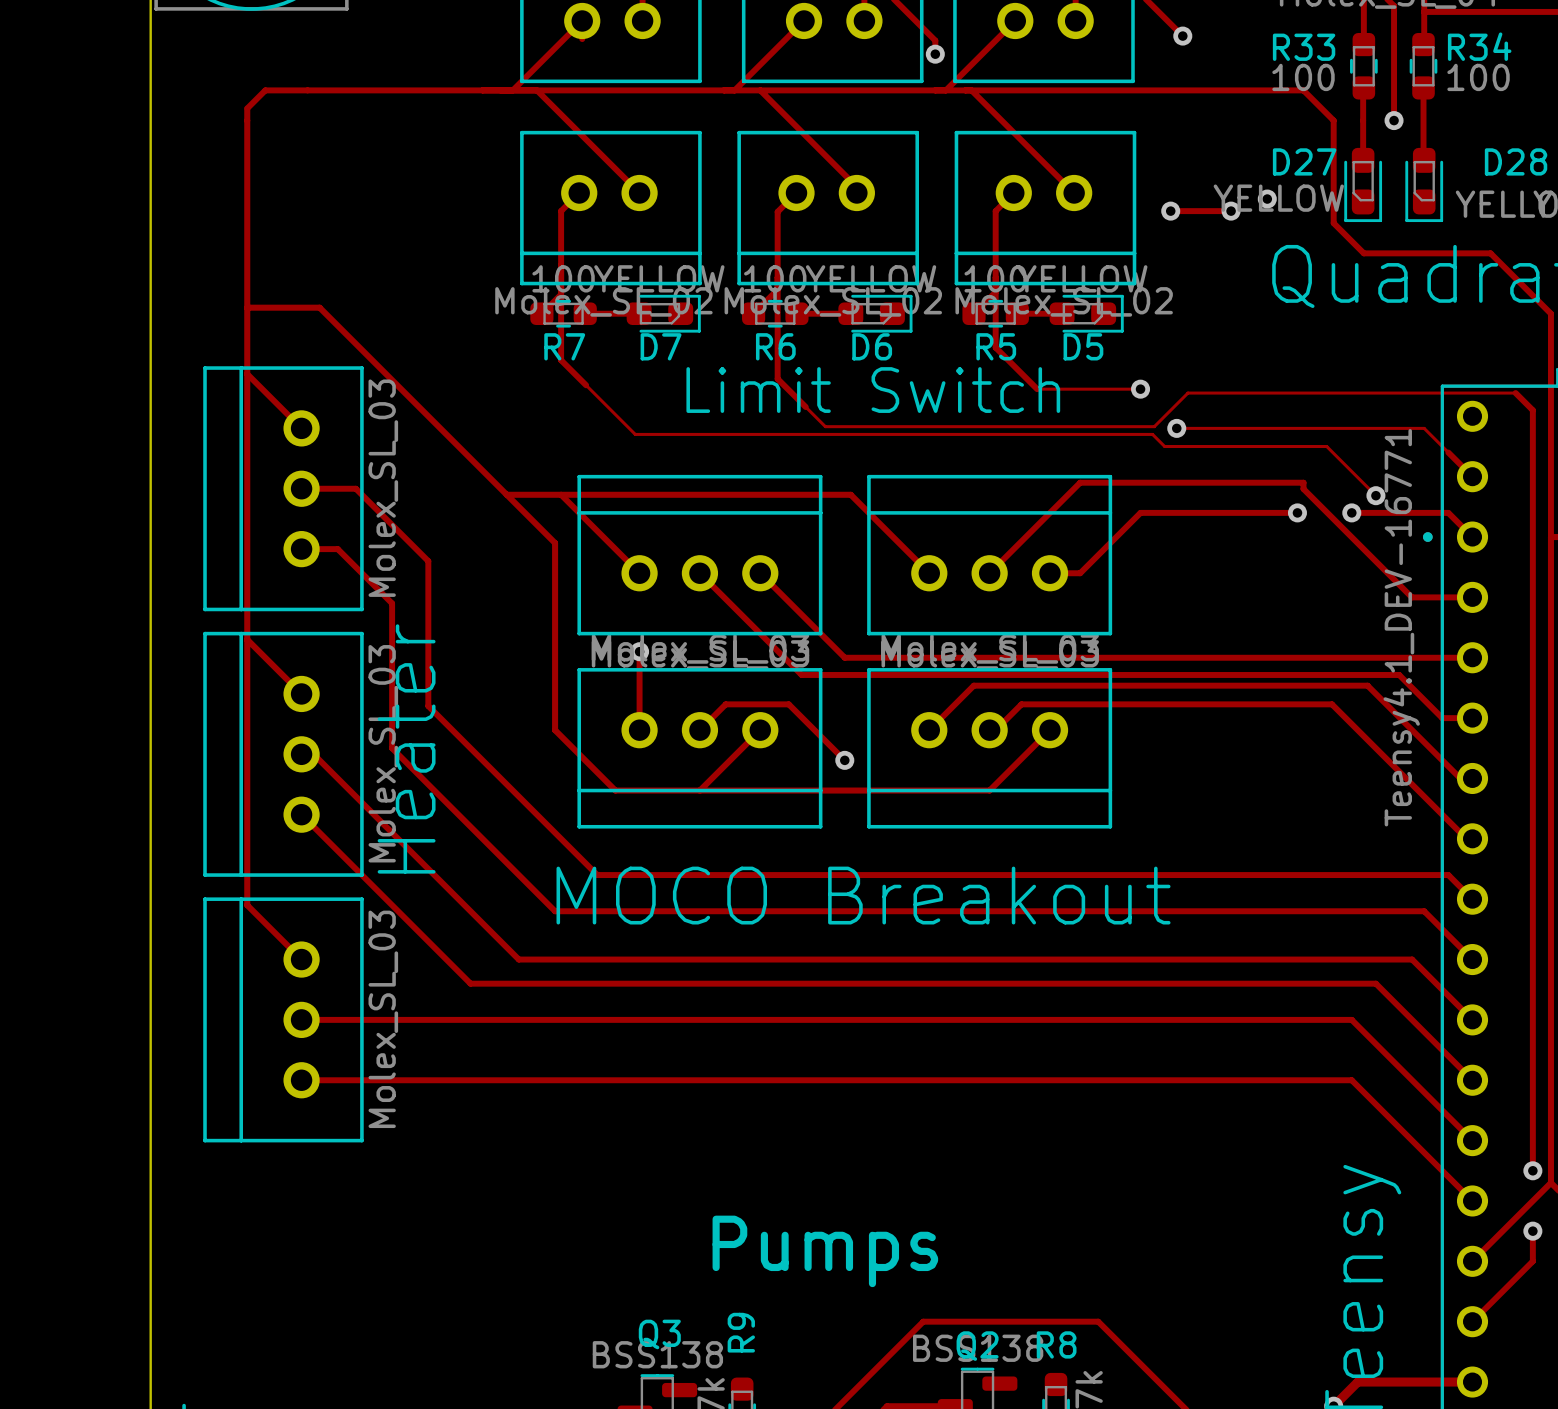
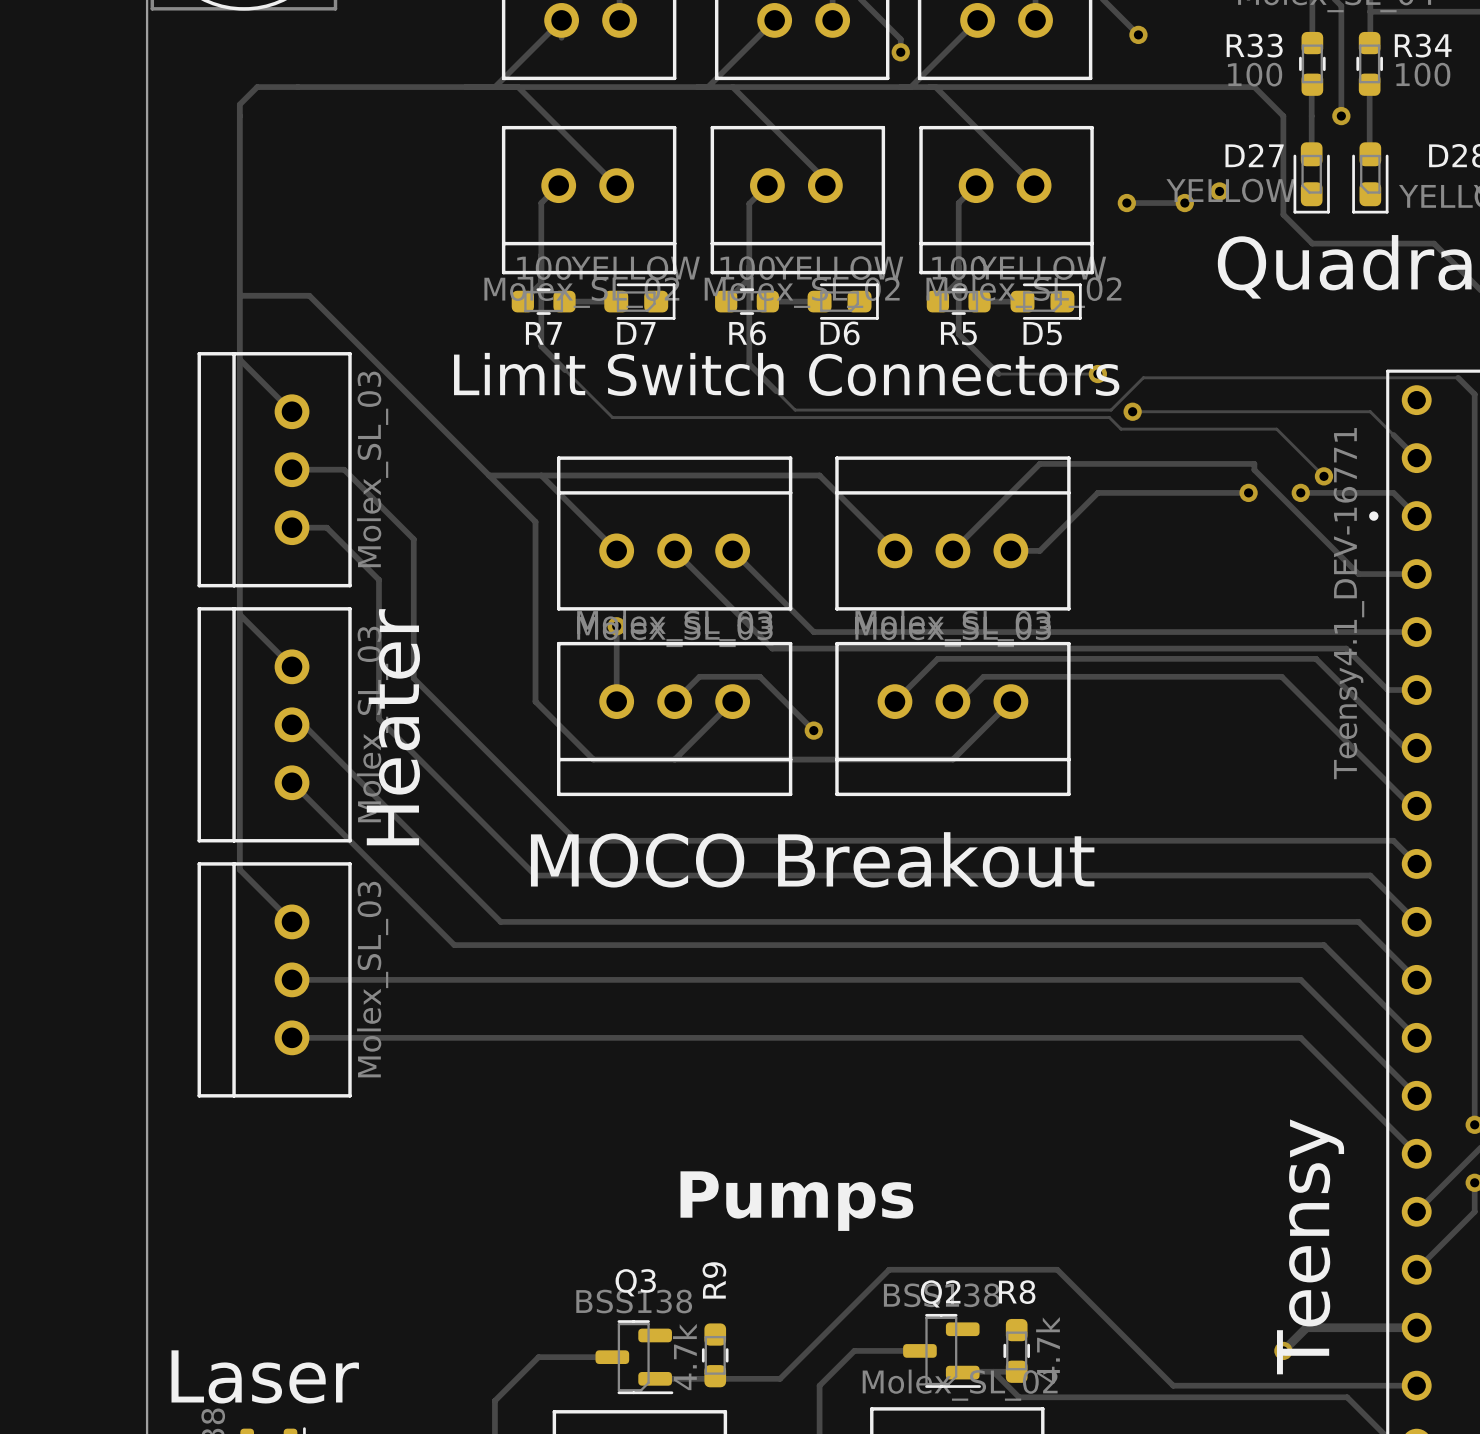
text: Limit Switch (873, 390) -> Limit Switch Connectors (786, 374)

